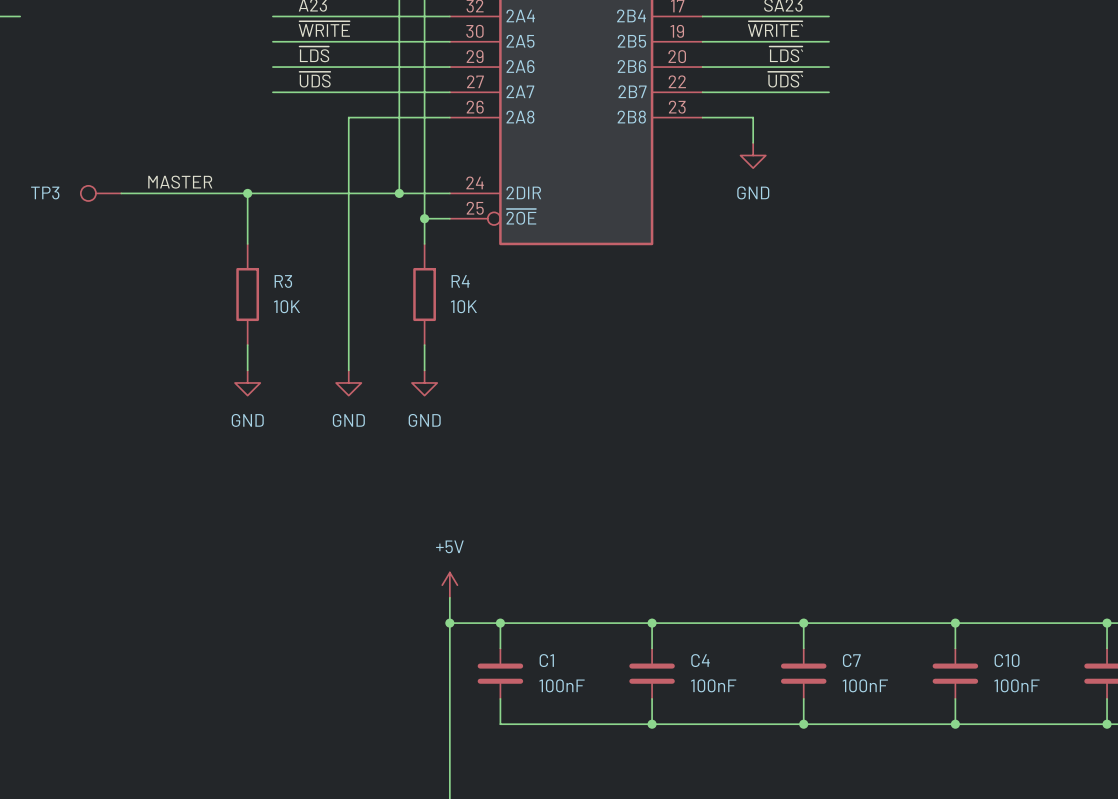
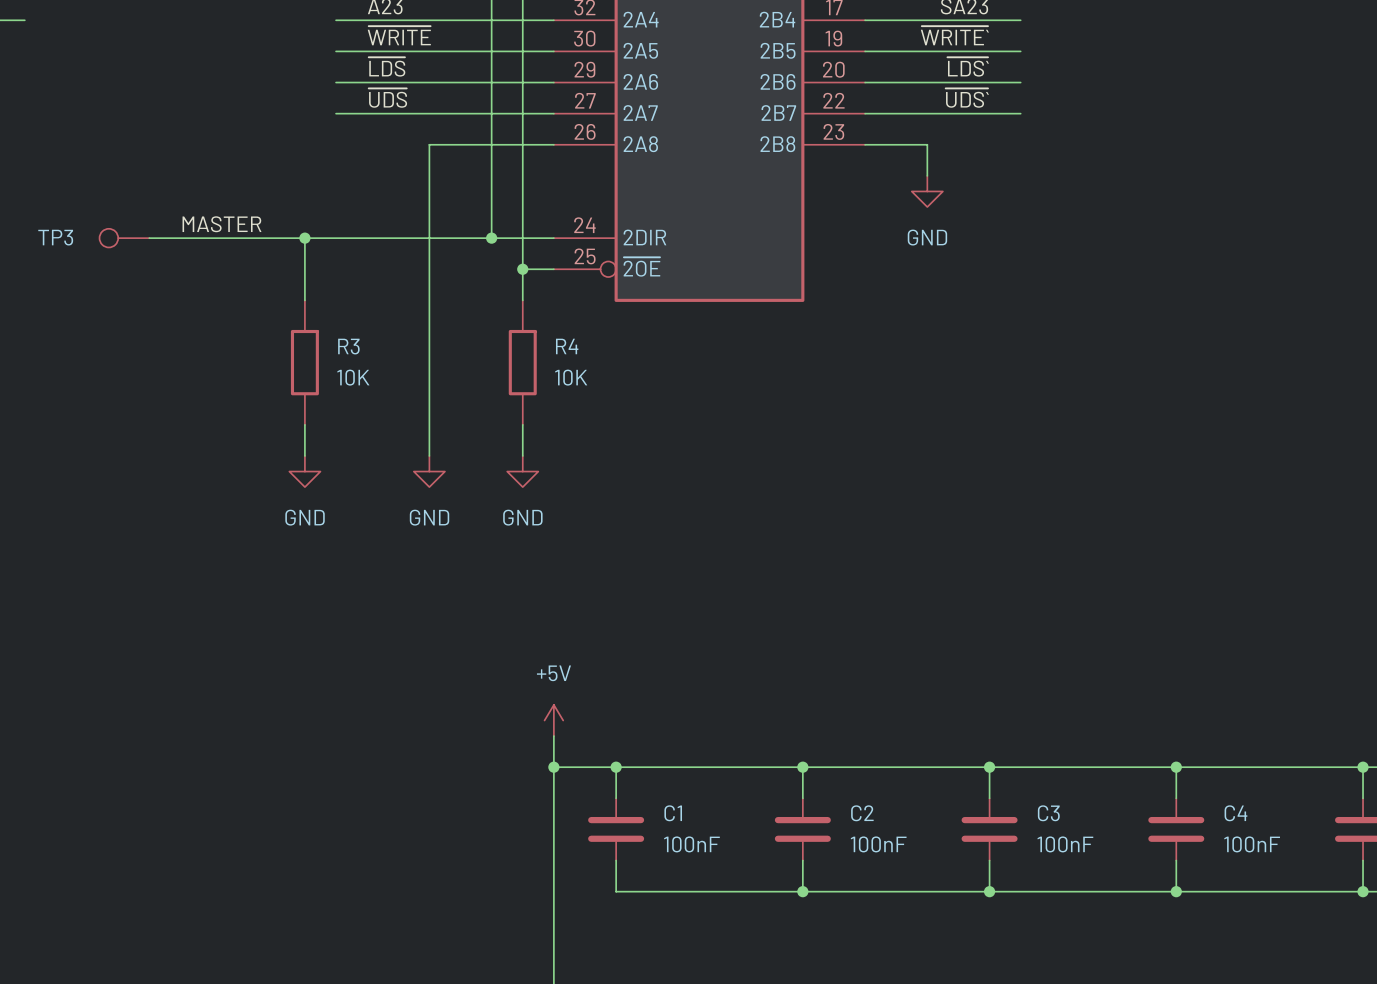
C4 name: C4 (700, 660) -> C2 (862, 813)
C7 name: C7 (851, 660) -> C3 (1048, 813)
C10 name: C10 (1007, 660) -> C4 (1235, 813)

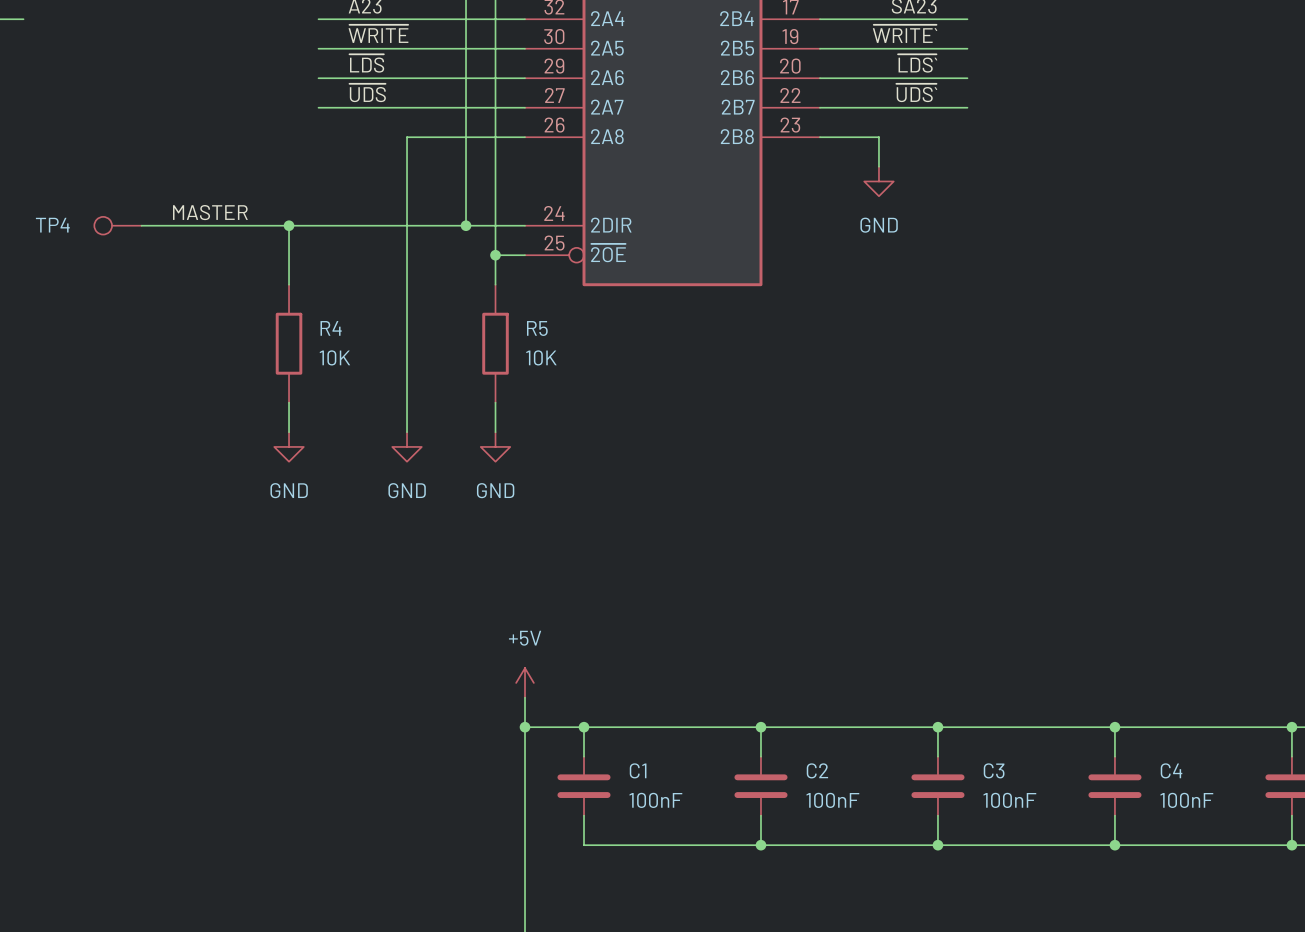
TP3 name: TP3 (55, 237) -> TP4 (52, 225)
R3 name: R3 (348, 346) -> R4 (331, 328)
R4 name: R4 (567, 346) -> R5 (537, 328)

